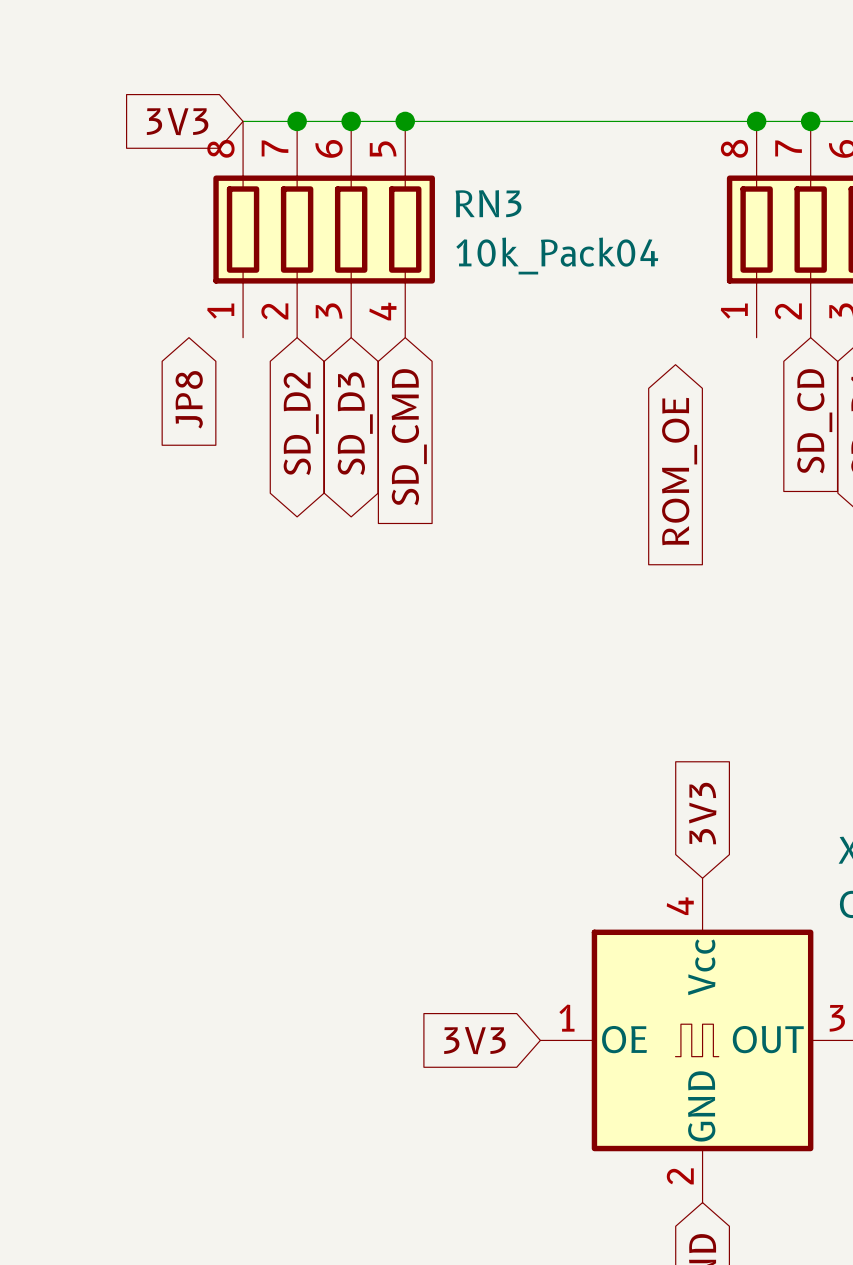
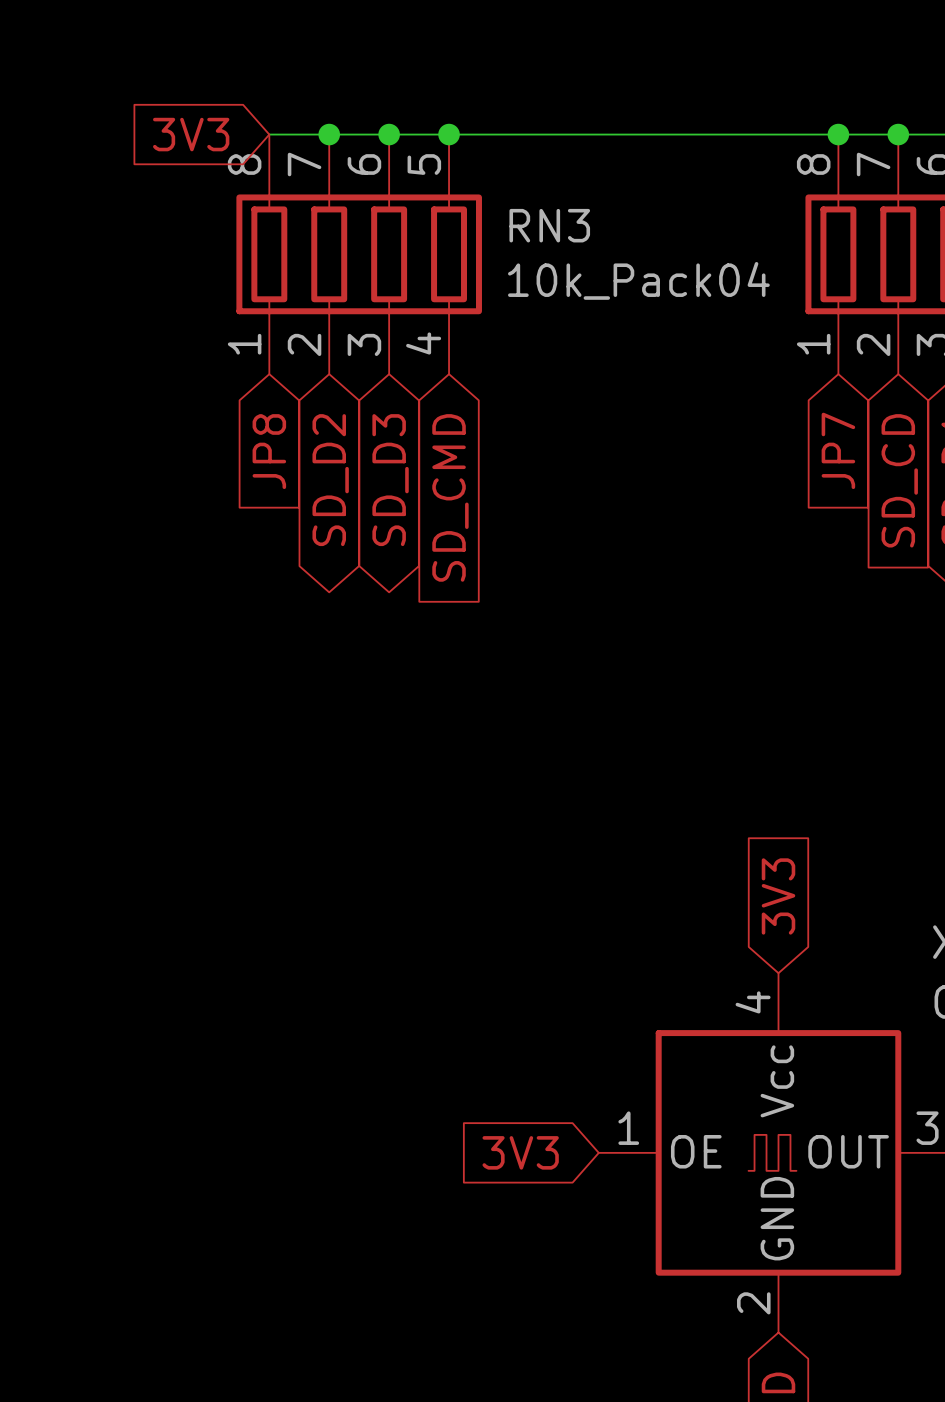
global label position: JP8 (189, 399) -> JP8 (269, 451)
global label: none -> JP7 (838, 450)
global label: ROM_OE (679, 471) -> none

